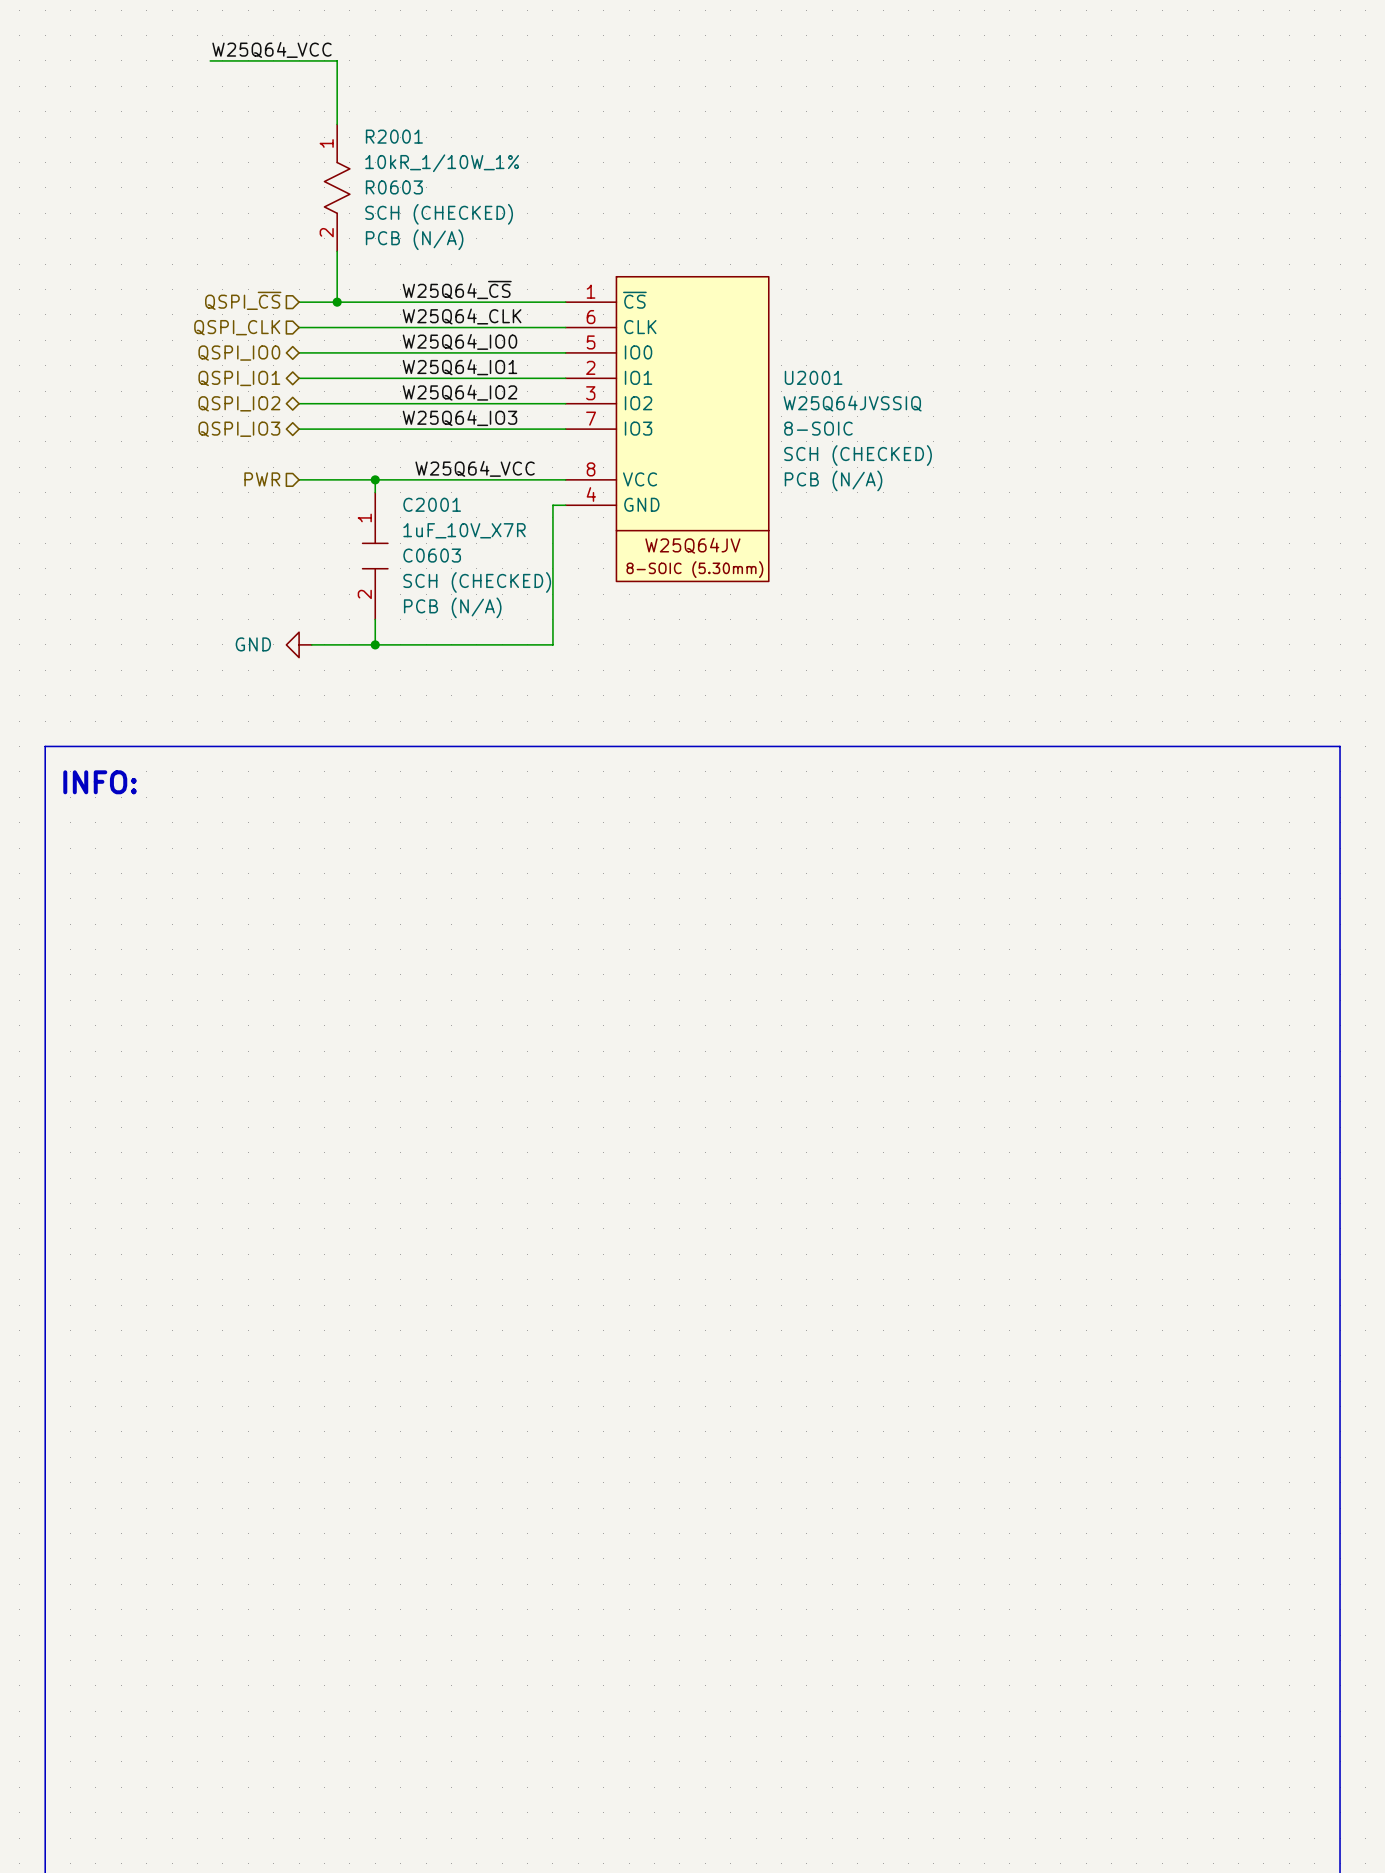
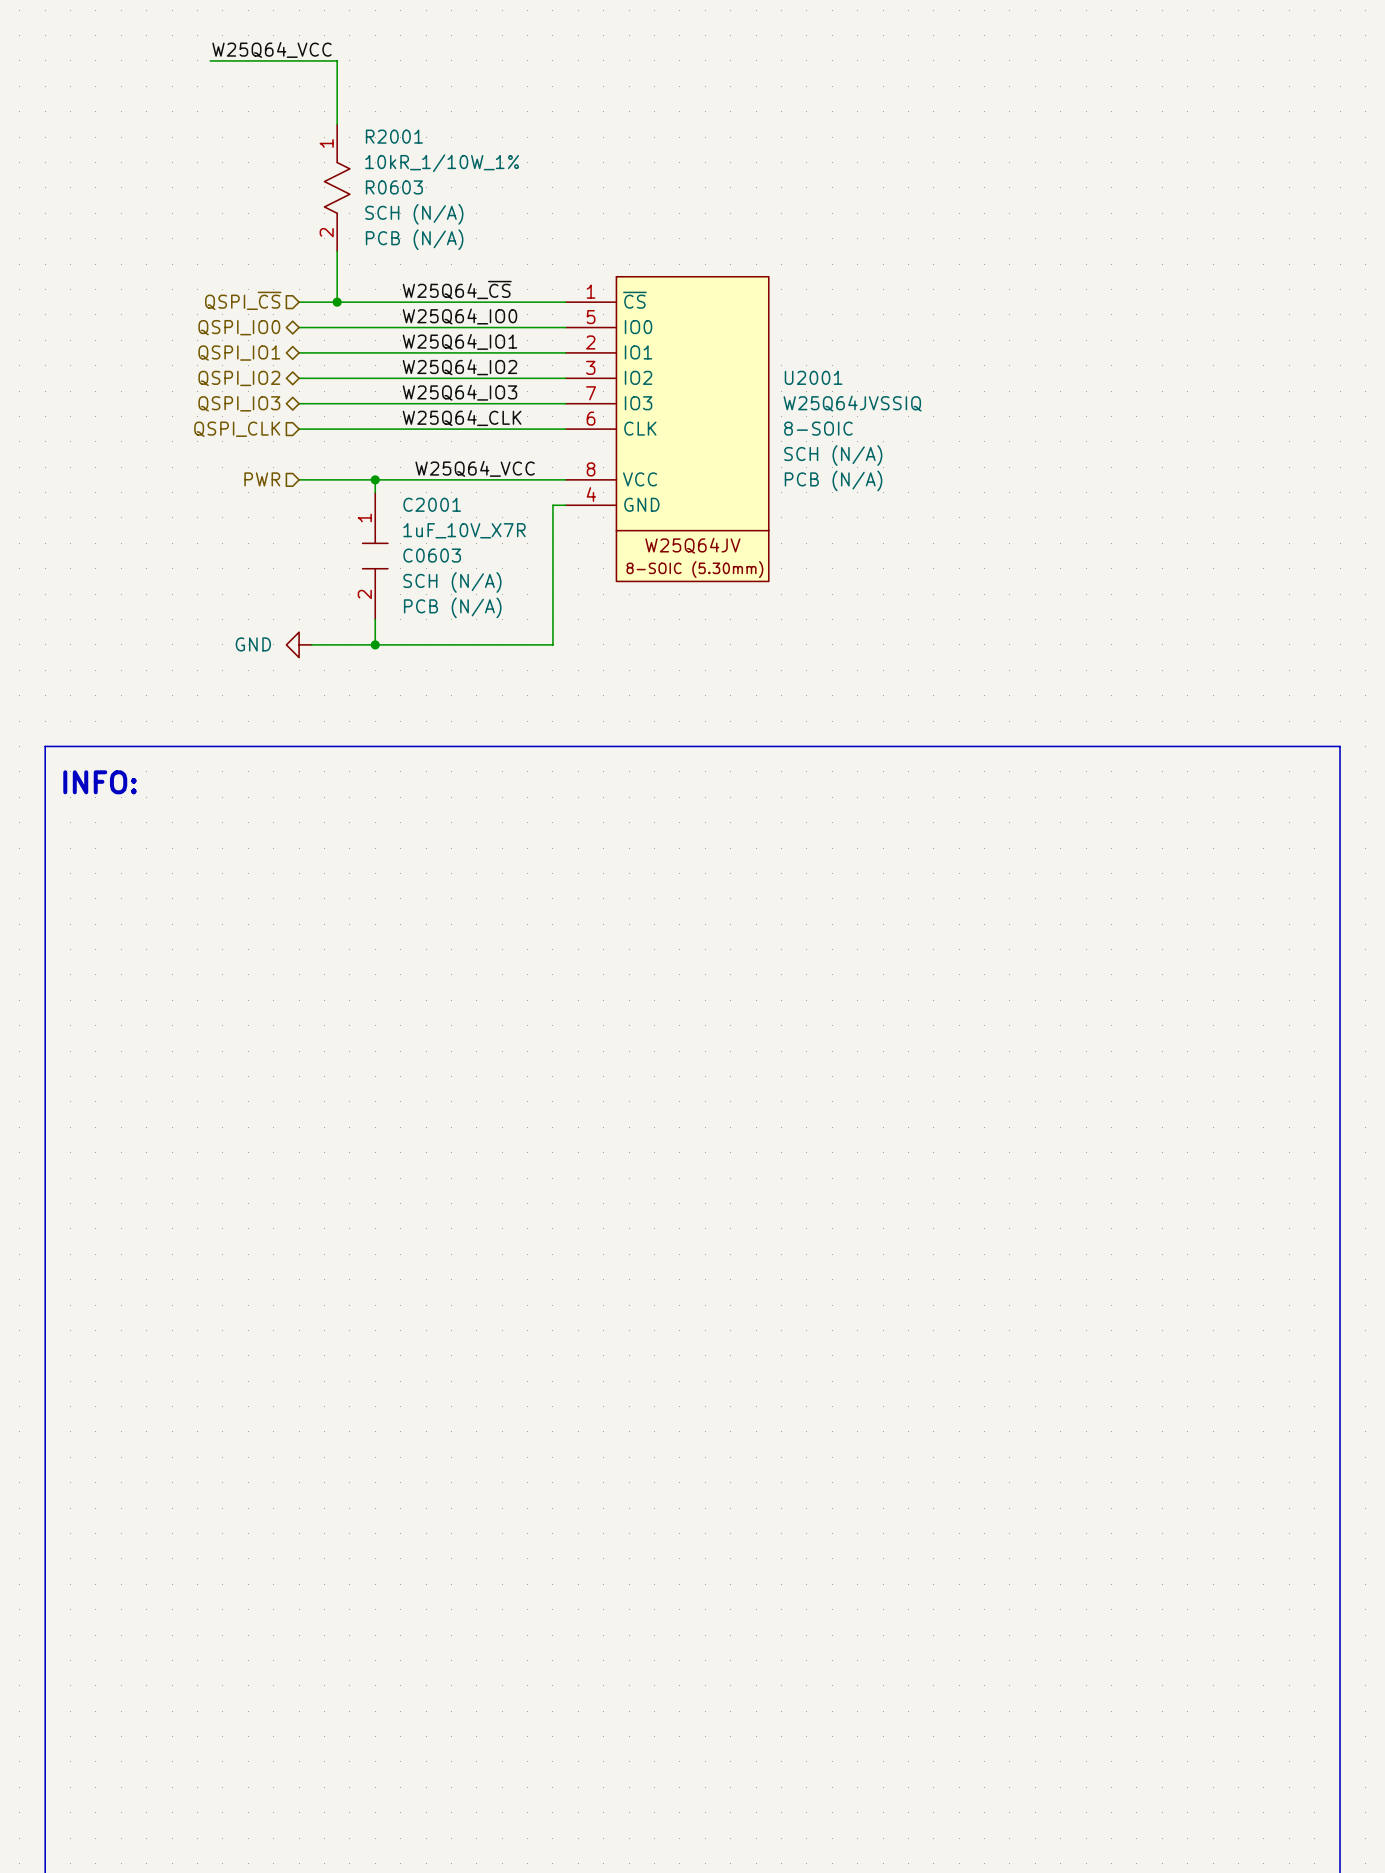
R2001 text: SCH (CHECKED) (439, 214) -> SCH (N/A) (414, 214)
U2001 symbol: [565, 276, 769, 582] -> [565, 276, 769, 582]
label: W25Q64_CLK (462, 316) -> W25Q64_IO0 (459, 316)
hierarchical label shape: input (237, 327) -> bidirectional (239, 327)
hierarchical label: QSPI_CLK (237, 327) -> QSPI_IO0 (239, 327)
label: W25Q64_IO0 (459, 341) -> W25Q64_IO1 (459, 341)
hierarchical label: QSPI_IO0 (239, 353) -> QSPI_IO1 (239, 353)
label: W25Q64_IO1 (459, 367) -> W25Q64_IO2 (459, 367)
hierarchical label: QSPI_IO1 (239, 378) -> QSPI_IO2 (239, 378)
label: W25Q64_IO2 (459, 392) -> W25Q64_IO3 (459, 392)
hierarchical label: QSPI_IO2 (239, 403) -> QSPI_IO3 (239, 403)
label: W25Q64_IO3 (459, 418) -> W25Q64_CLK (462, 418)
hierarchical label shape: bidirectional (239, 429) -> input (237, 429)
hierarchical label: QSPI_IO3 (239, 429) -> QSPI_CLK (237, 429)
U2001 text: SCH (CHECKED) (858, 455) -> SCH (N/A) (833, 455)
C2001 text: SCH (CHECKED) (477, 582) -> SCH (N/A) (452, 582)

